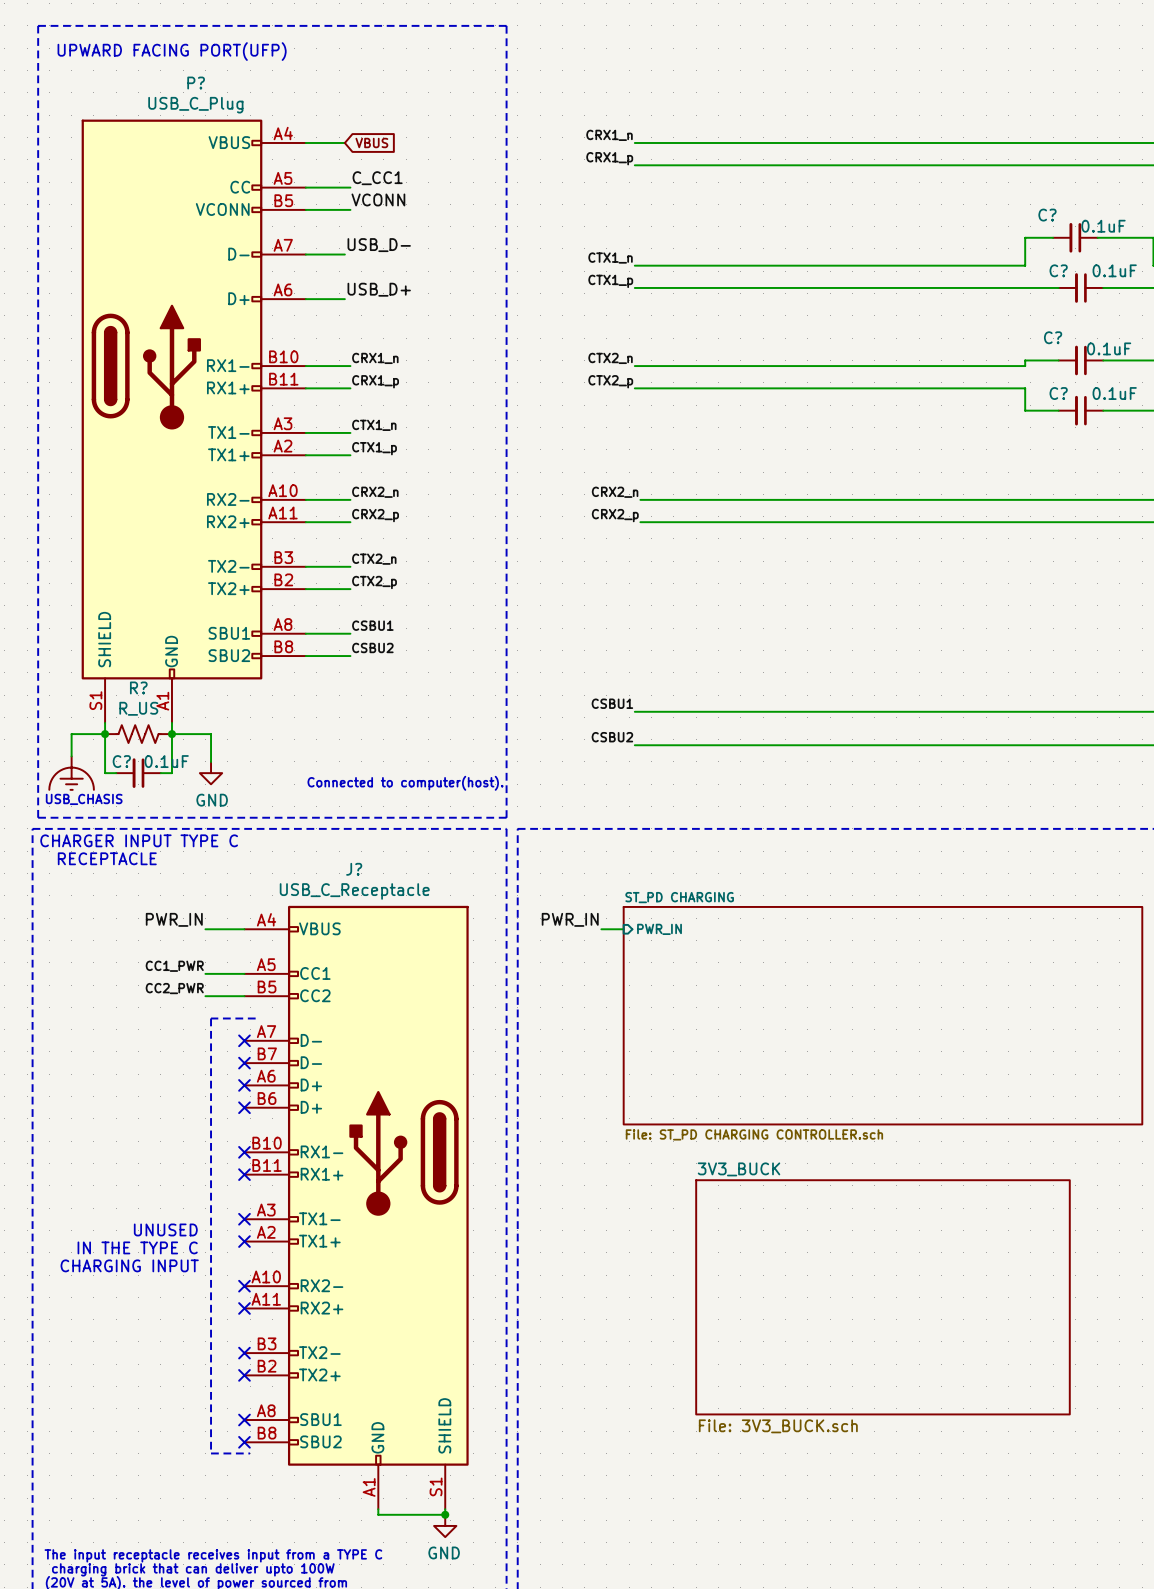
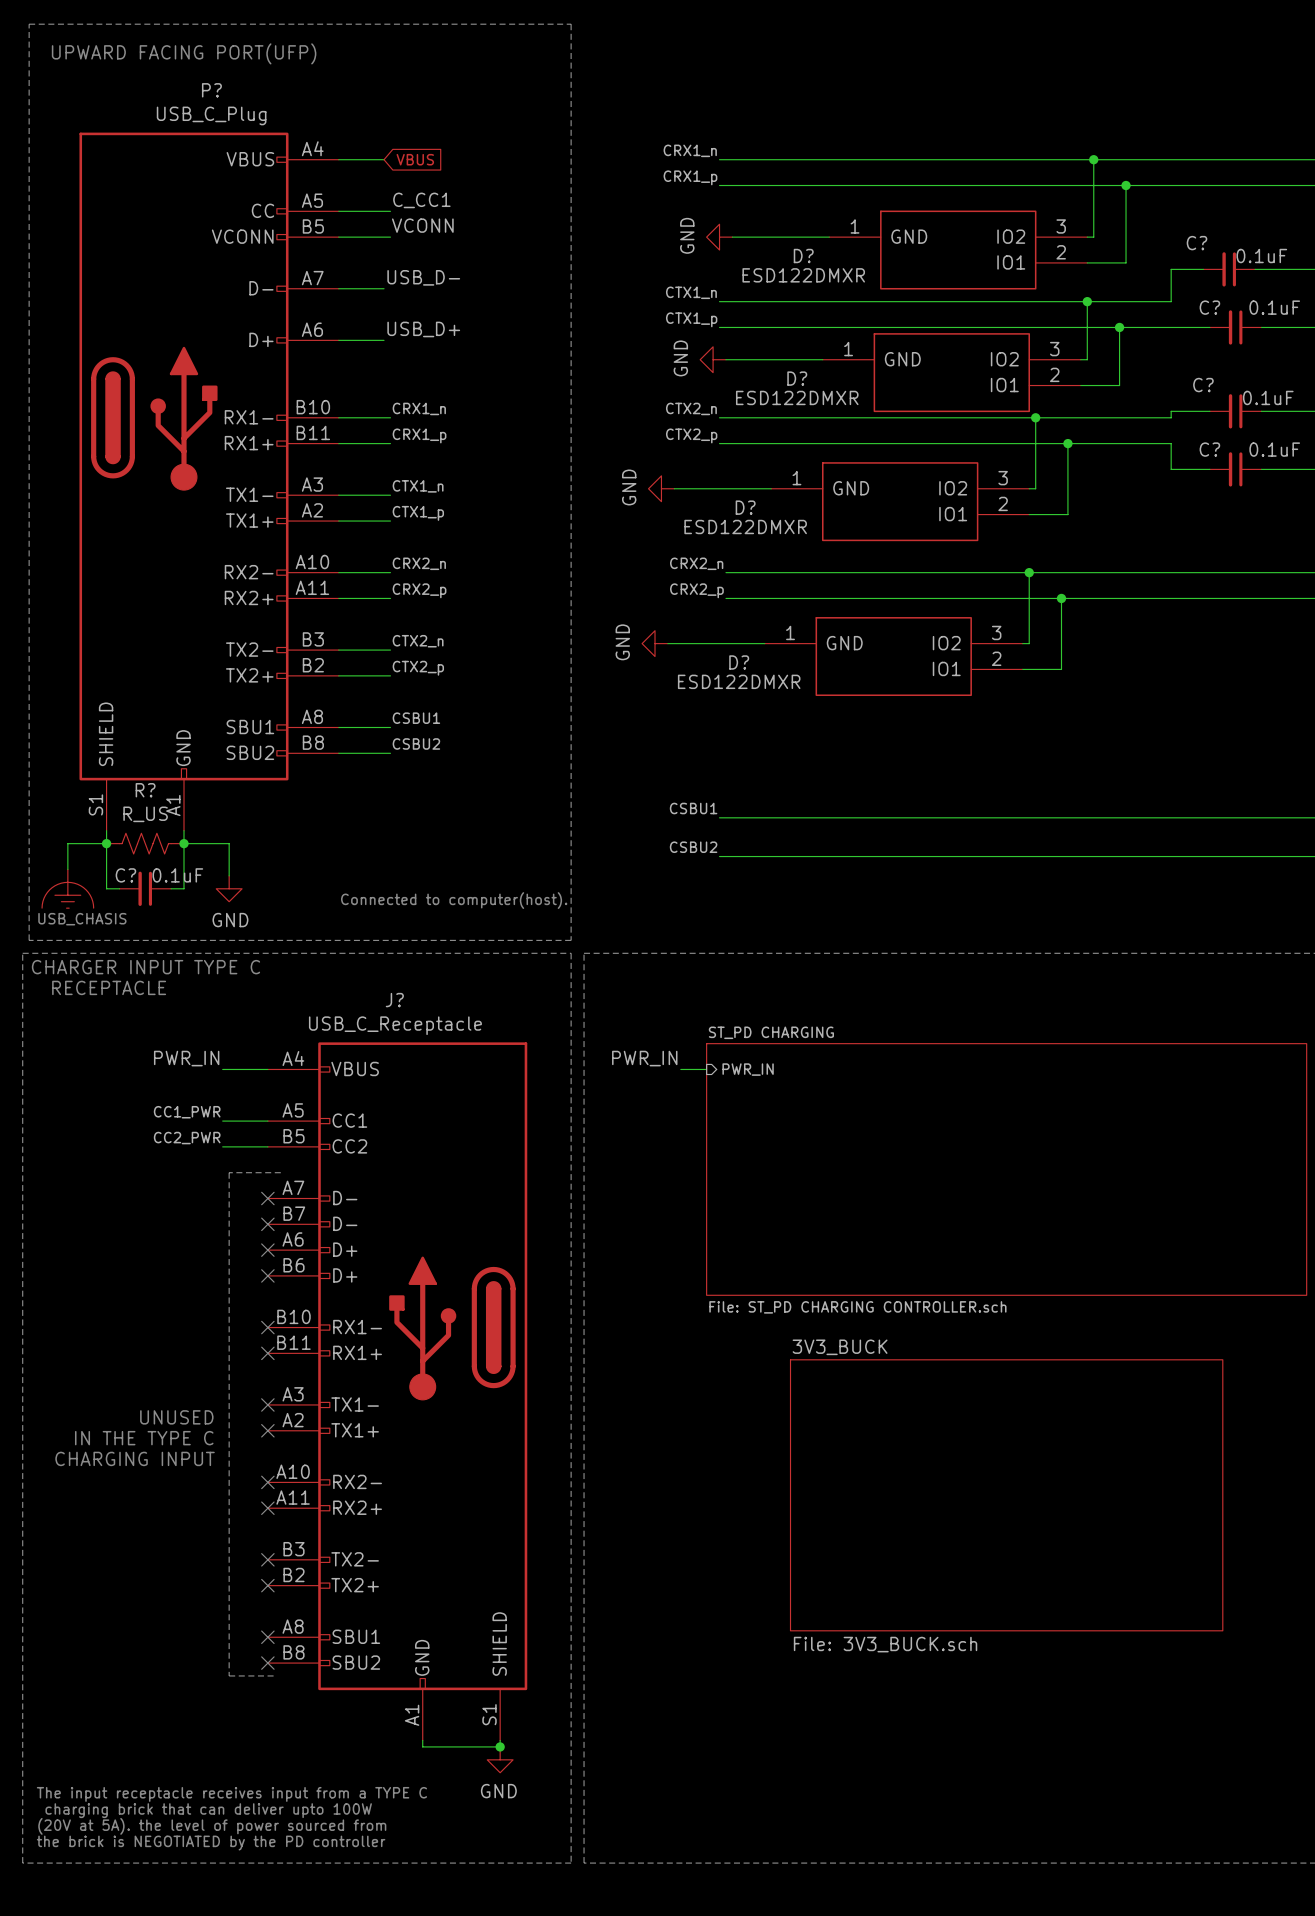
wire: none -> (1093, 159) (1093, 237) (1087, 237)
junction: none -> (1093, 159)
wire: none -> (1126, 185) (1126, 262) (1087, 262)
junction: none -> (1126, 185)
power symbol: none -> GND (719, 237)
wire: none -> (732, 237) (829, 237)
D?: none -> ESD122DMXR (958, 250)
wire: none -> (1087, 301) (1087, 359) (1080, 359)
junction: none -> (1087, 301)
wire: none -> (1119, 327) (1119, 385) (1080, 385)
junction: none -> (1119, 327)
power symbol: none -> GND (713, 359)
wire: none -> (725, 359) (822, 359)
D?: none -> ESD122DMXR (951, 372)
wire: none -> (1035, 417) (1035, 488) (1029, 488)
junction: none -> (1035, 417)
wire: none -> (1067, 443) (1067, 514) (1029, 514)
junction: none -> (1067, 443)
power symbol: none -> GND (661, 488)
wire: none -> (674, 488) (771, 488)
D?: none -> ESD122DMXR (900, 501)
wire: none -> (1029, 572) (1029, 643) (1022, 643)
junction: none -> (1029, 572)
wire: none -> (1061, 598) (1061, 669) (1022, 669)
junction: none -> (1061, 598)
power symbol: none -> GND (655, 643)
wire: none -> (667, 643) (764, 643)
D?: none -> ESD122DMXR (893, 656)

